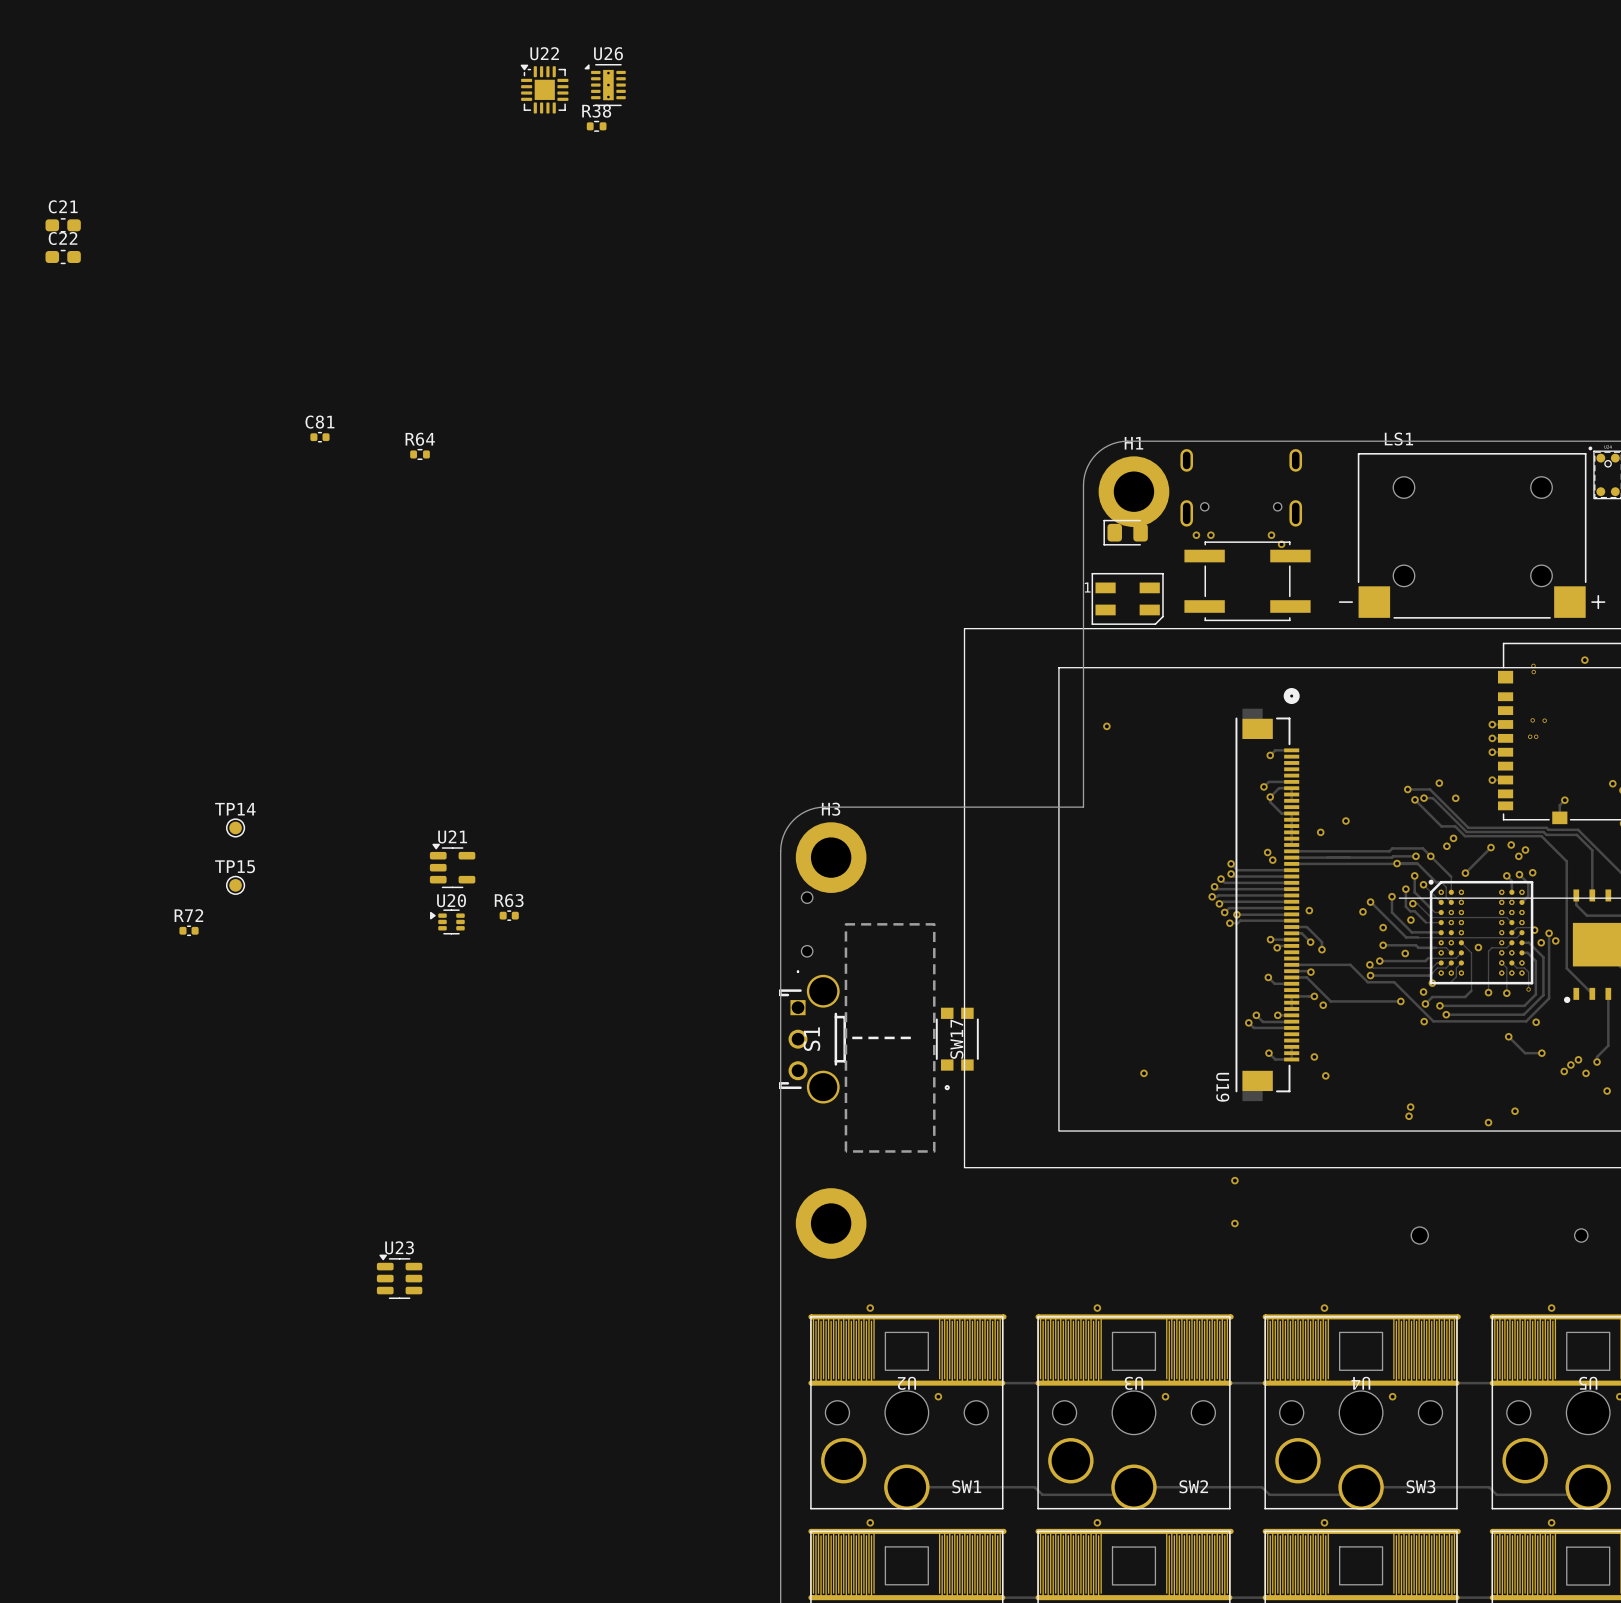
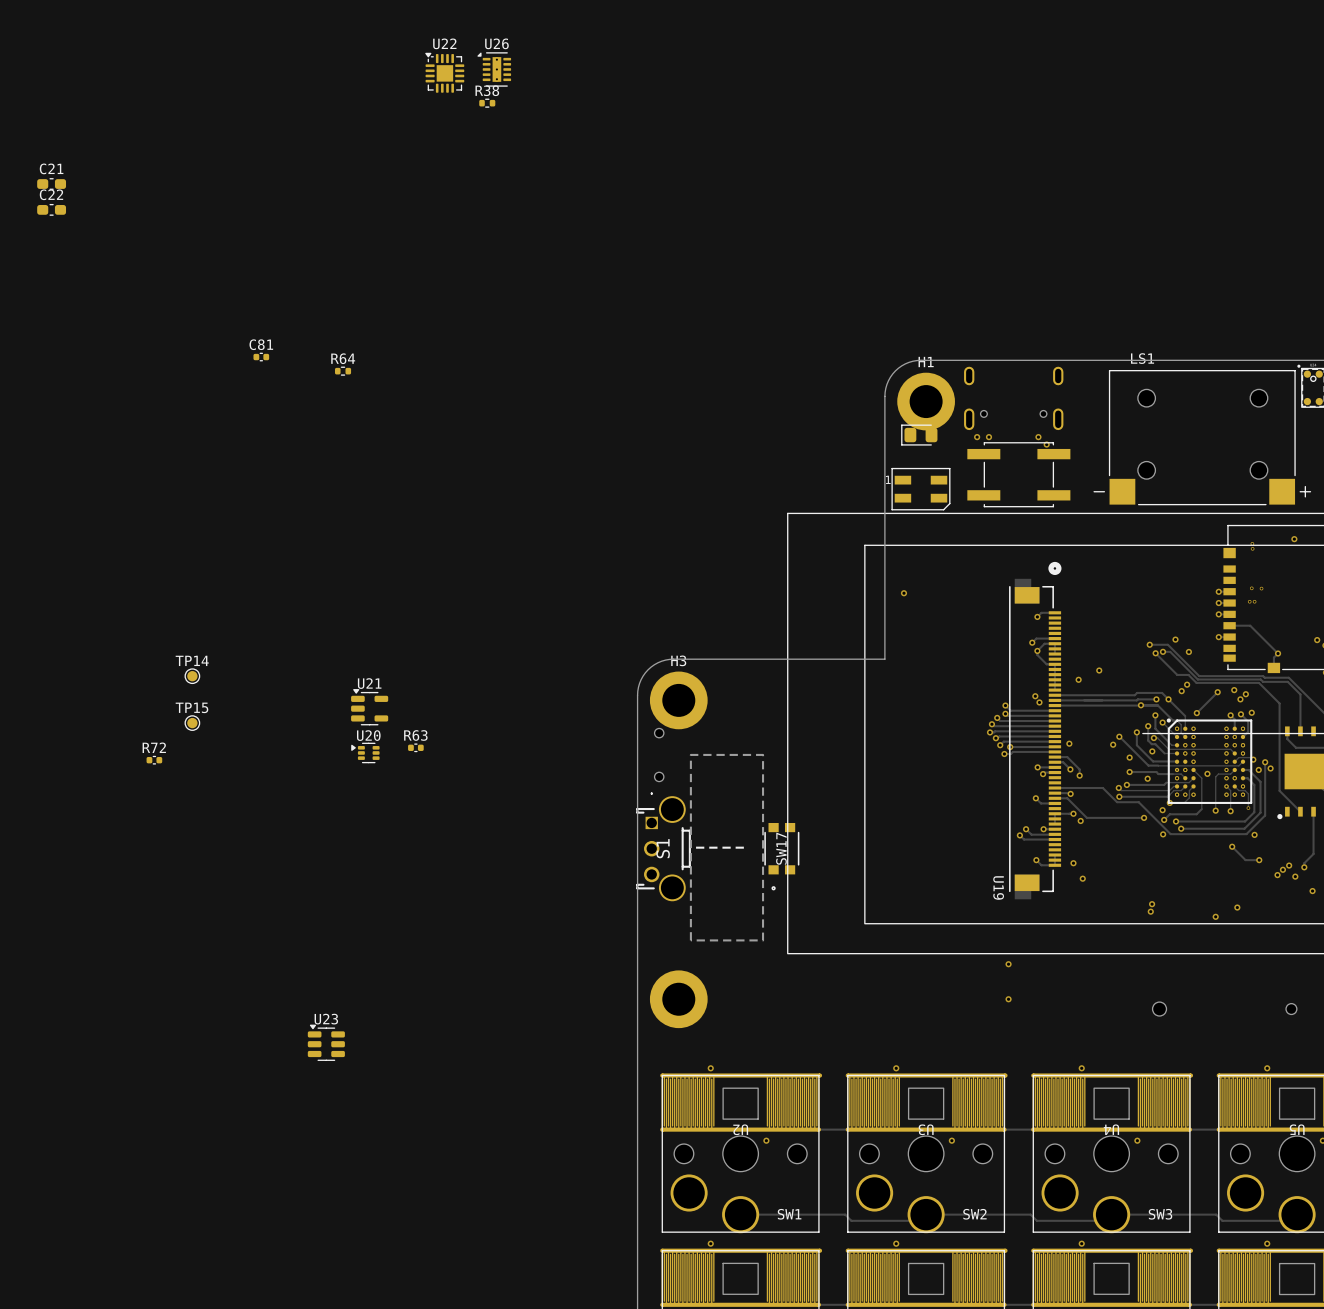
track: none -> (1229, 625) (1250, 625) (1278, 653)
via: (1143, 1073) -> none

